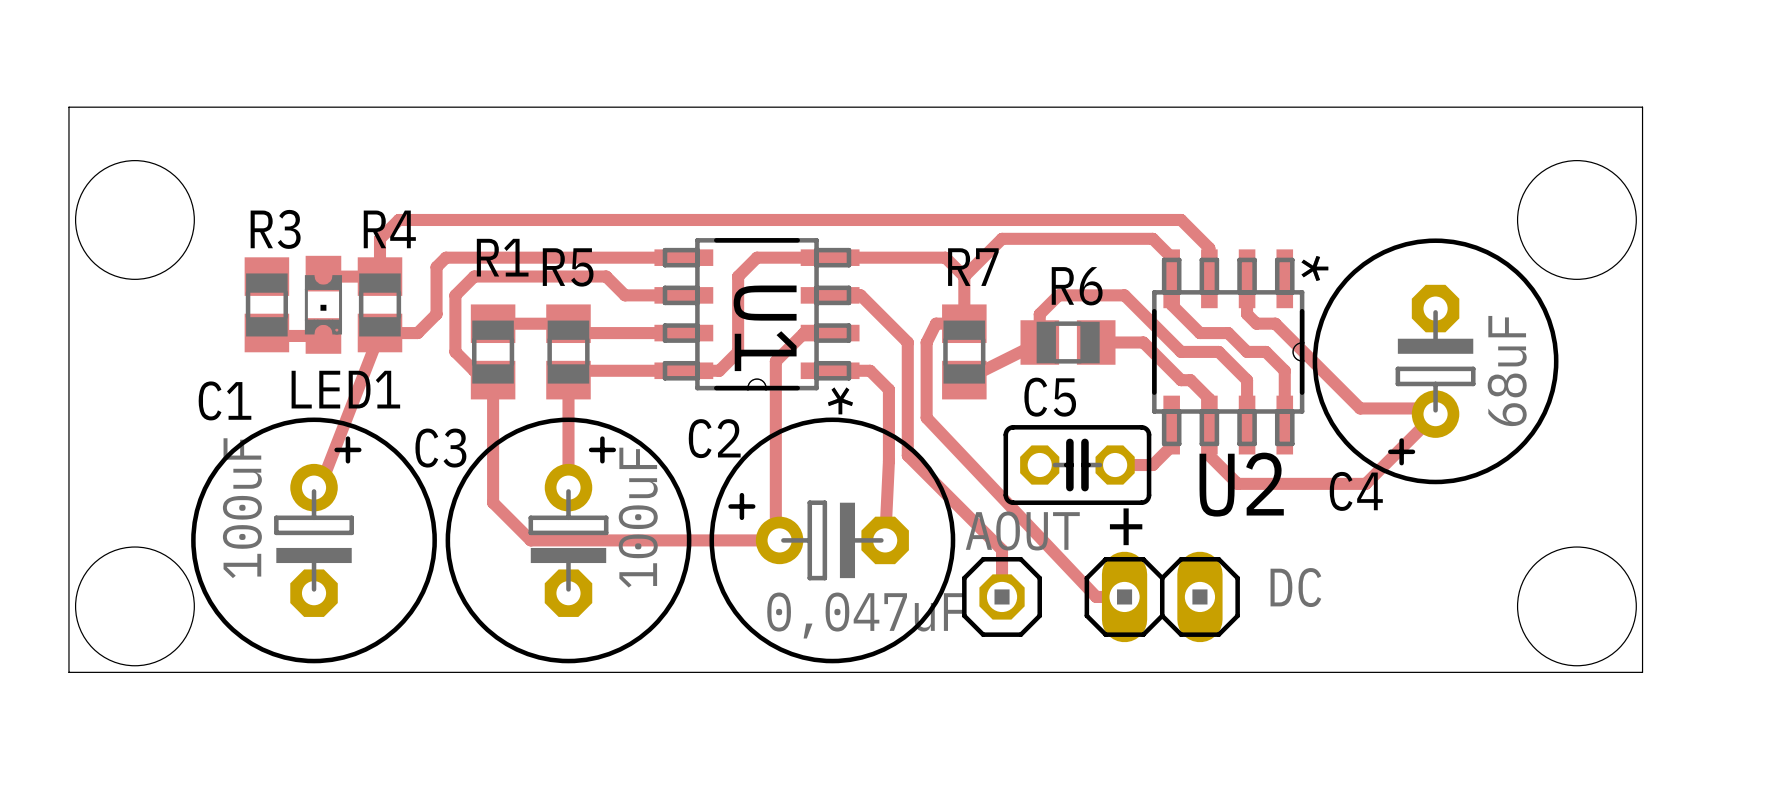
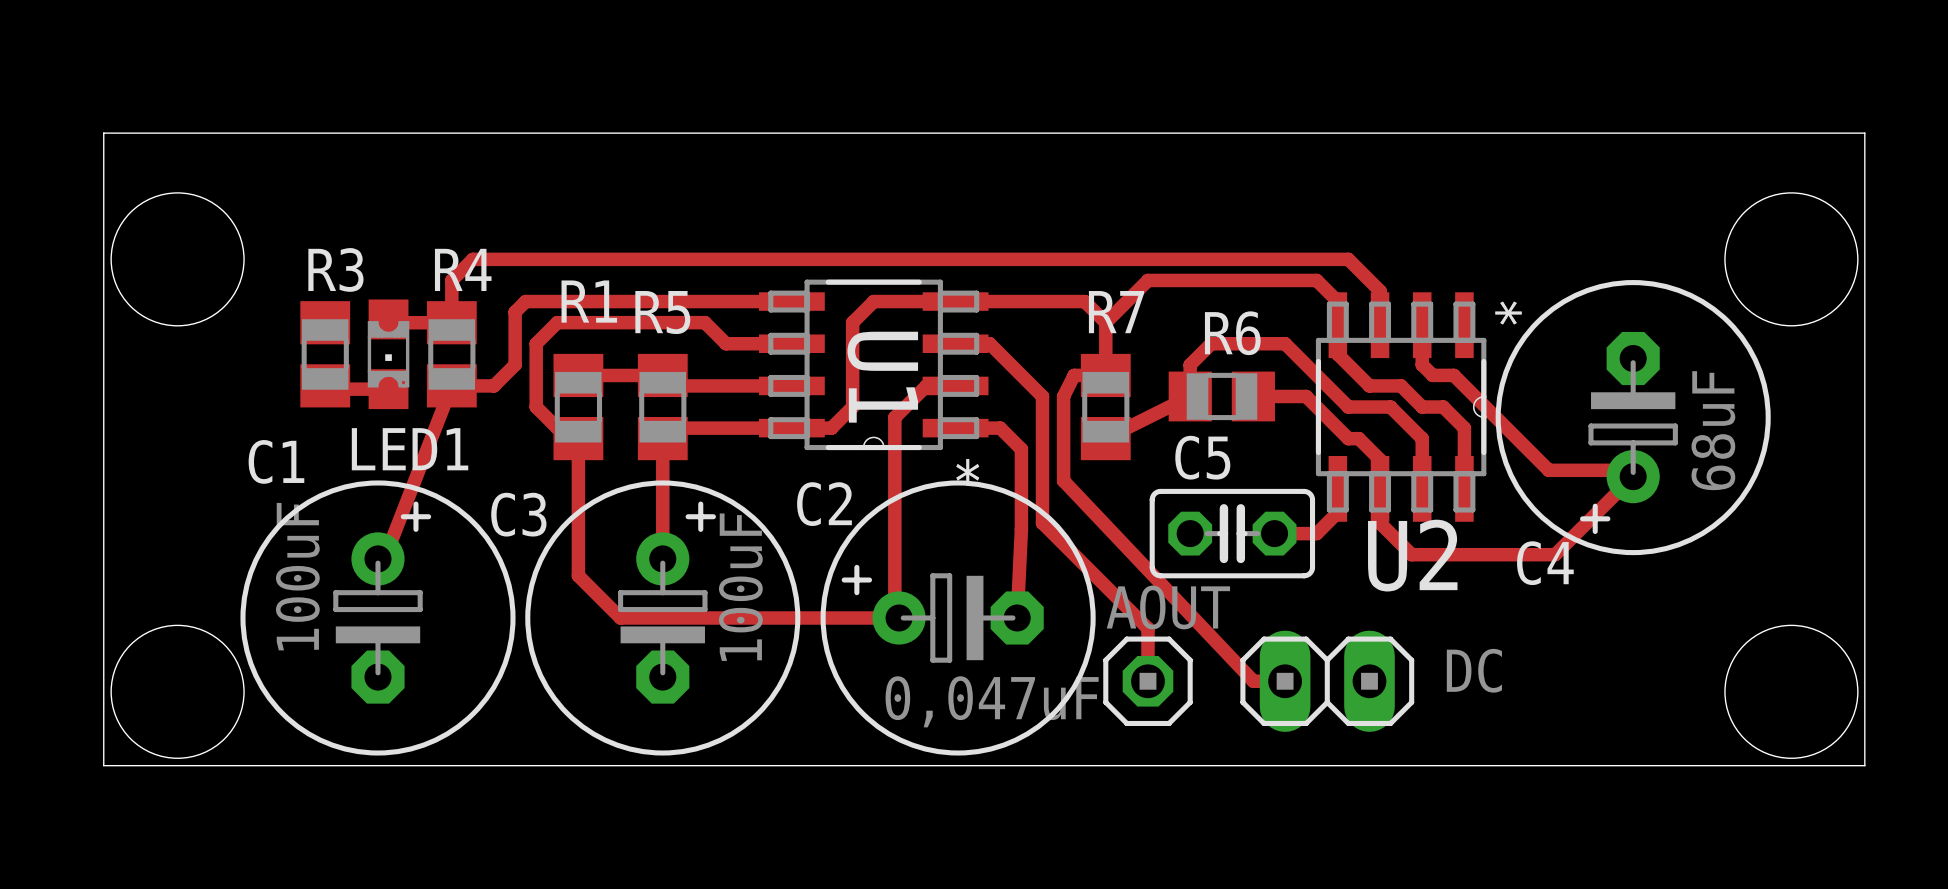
text: + (1126, 526) -> none

